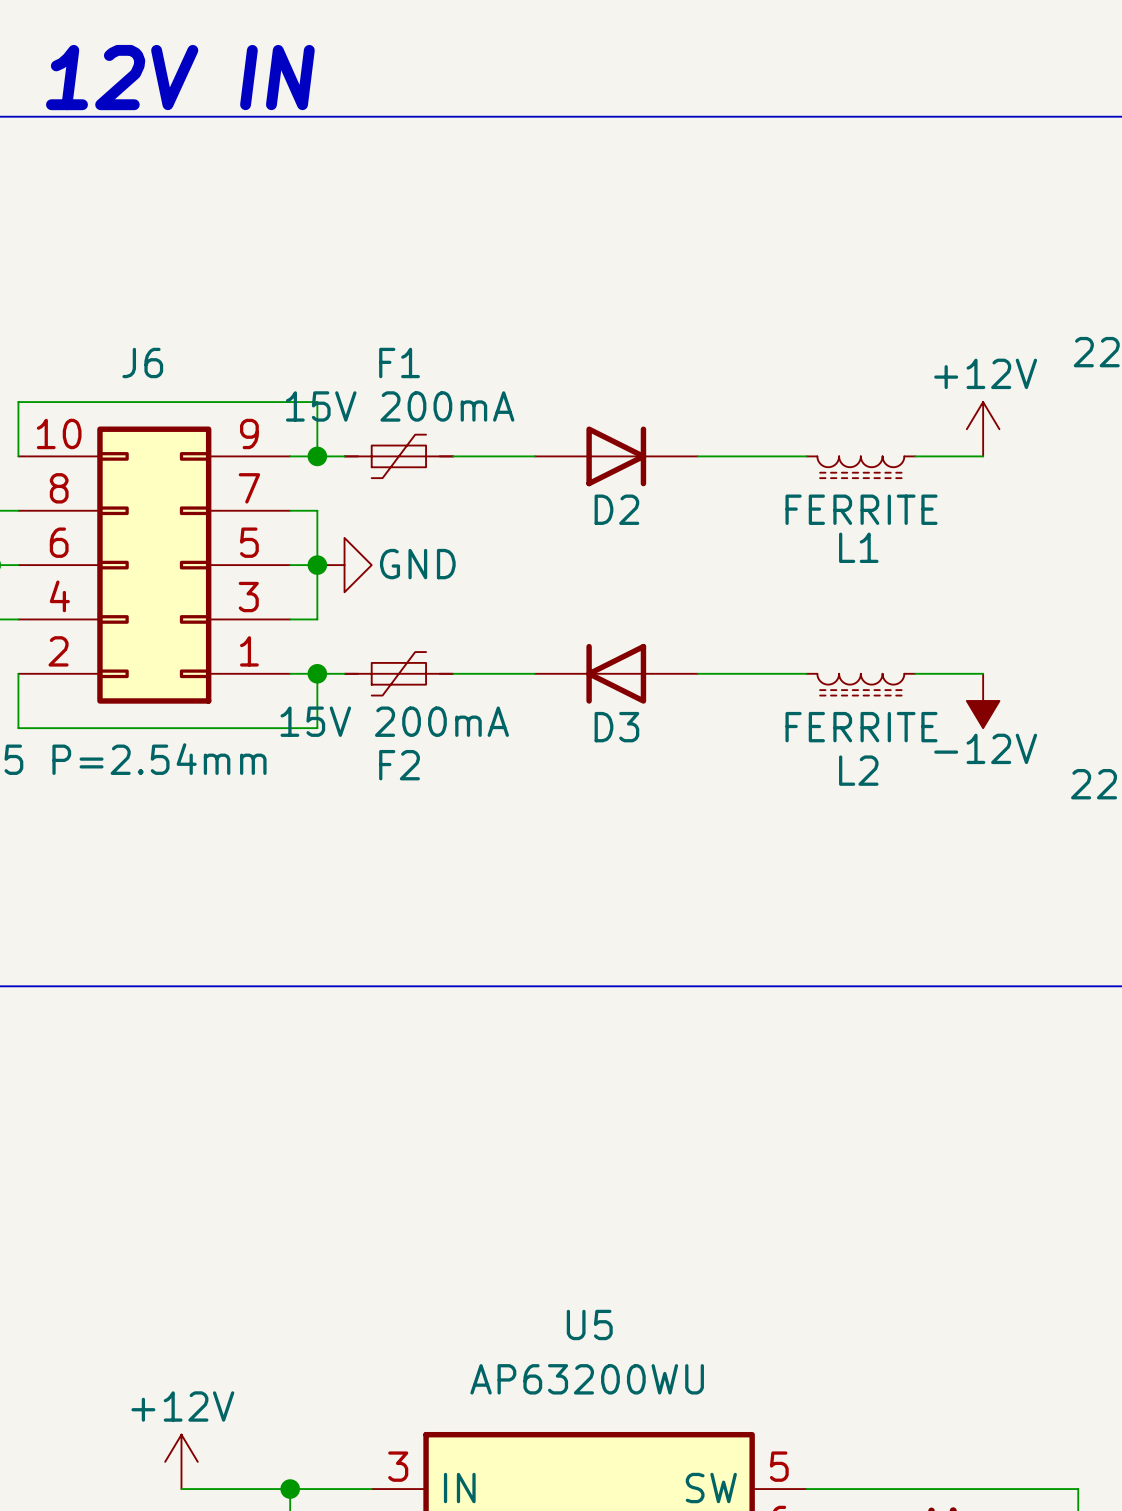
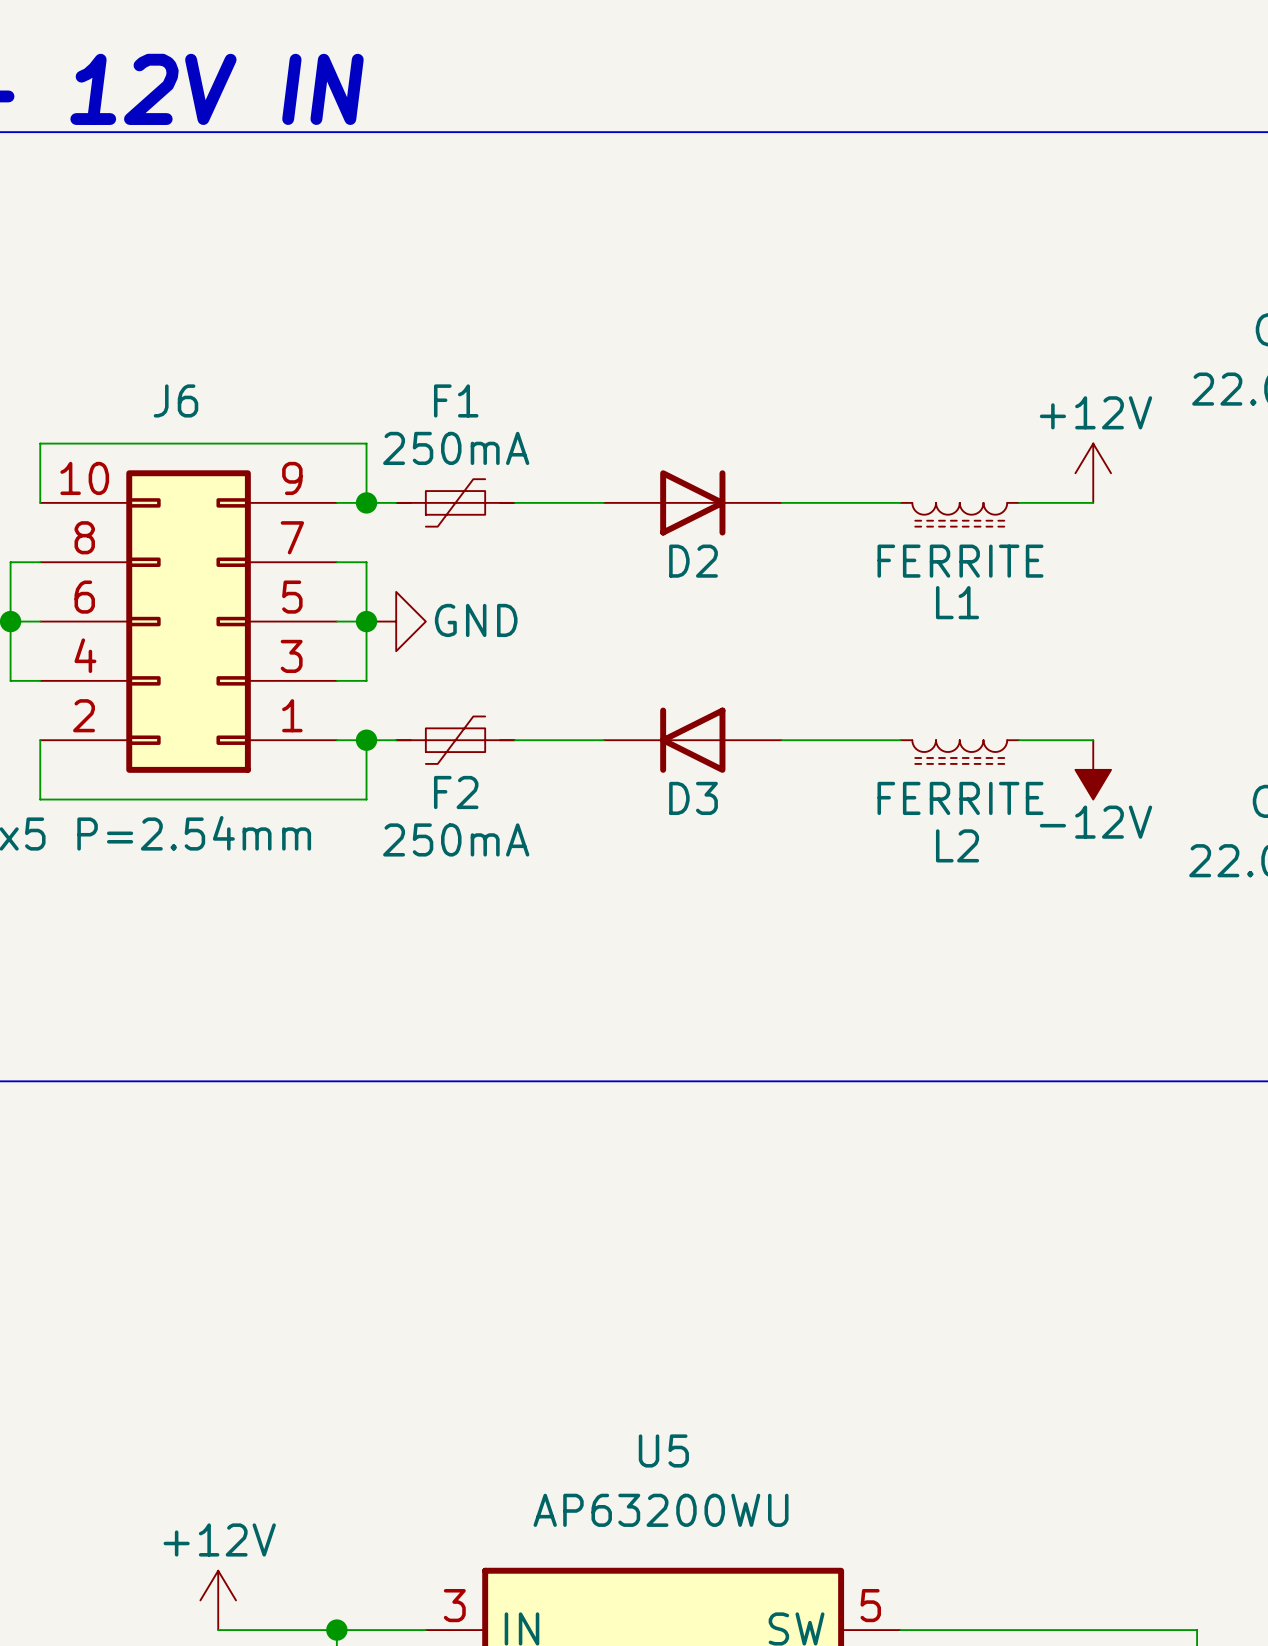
F1 value: 15V 200mA (400, 406) -> 250mA (456, 448)
F2 value: 15V 200mA (394, 721) -> 250mA (456, 839)
F2 name position: F2 (399, 765) -> F2 (456, 792)

